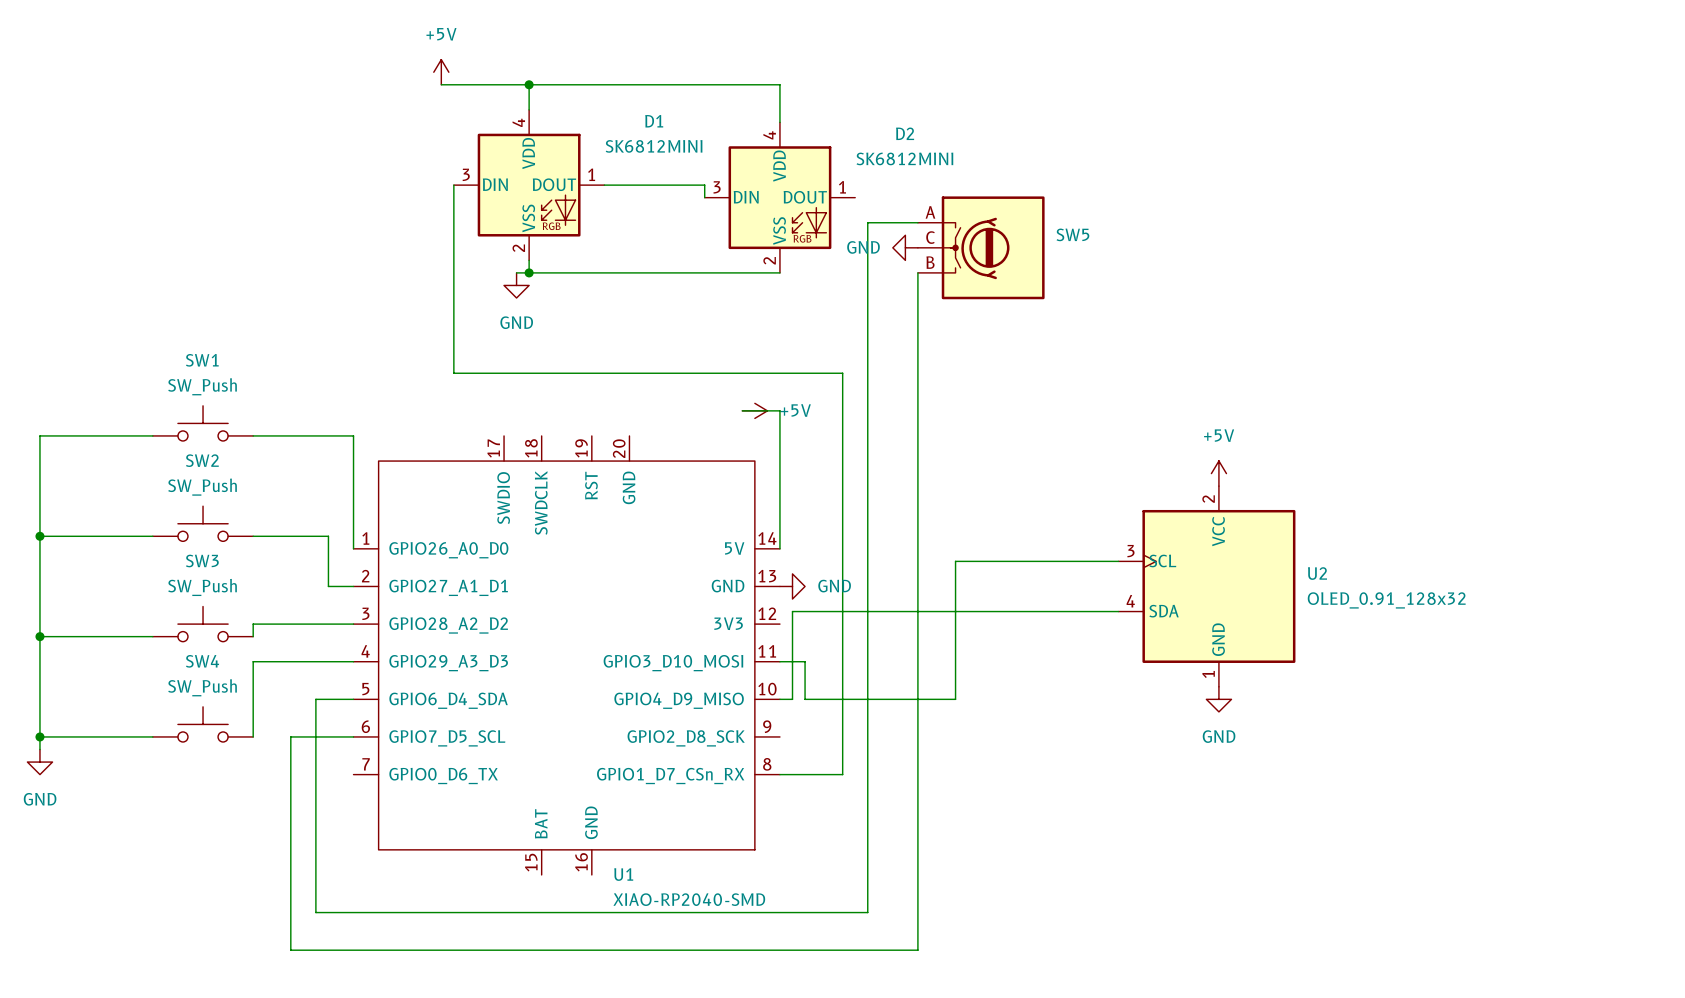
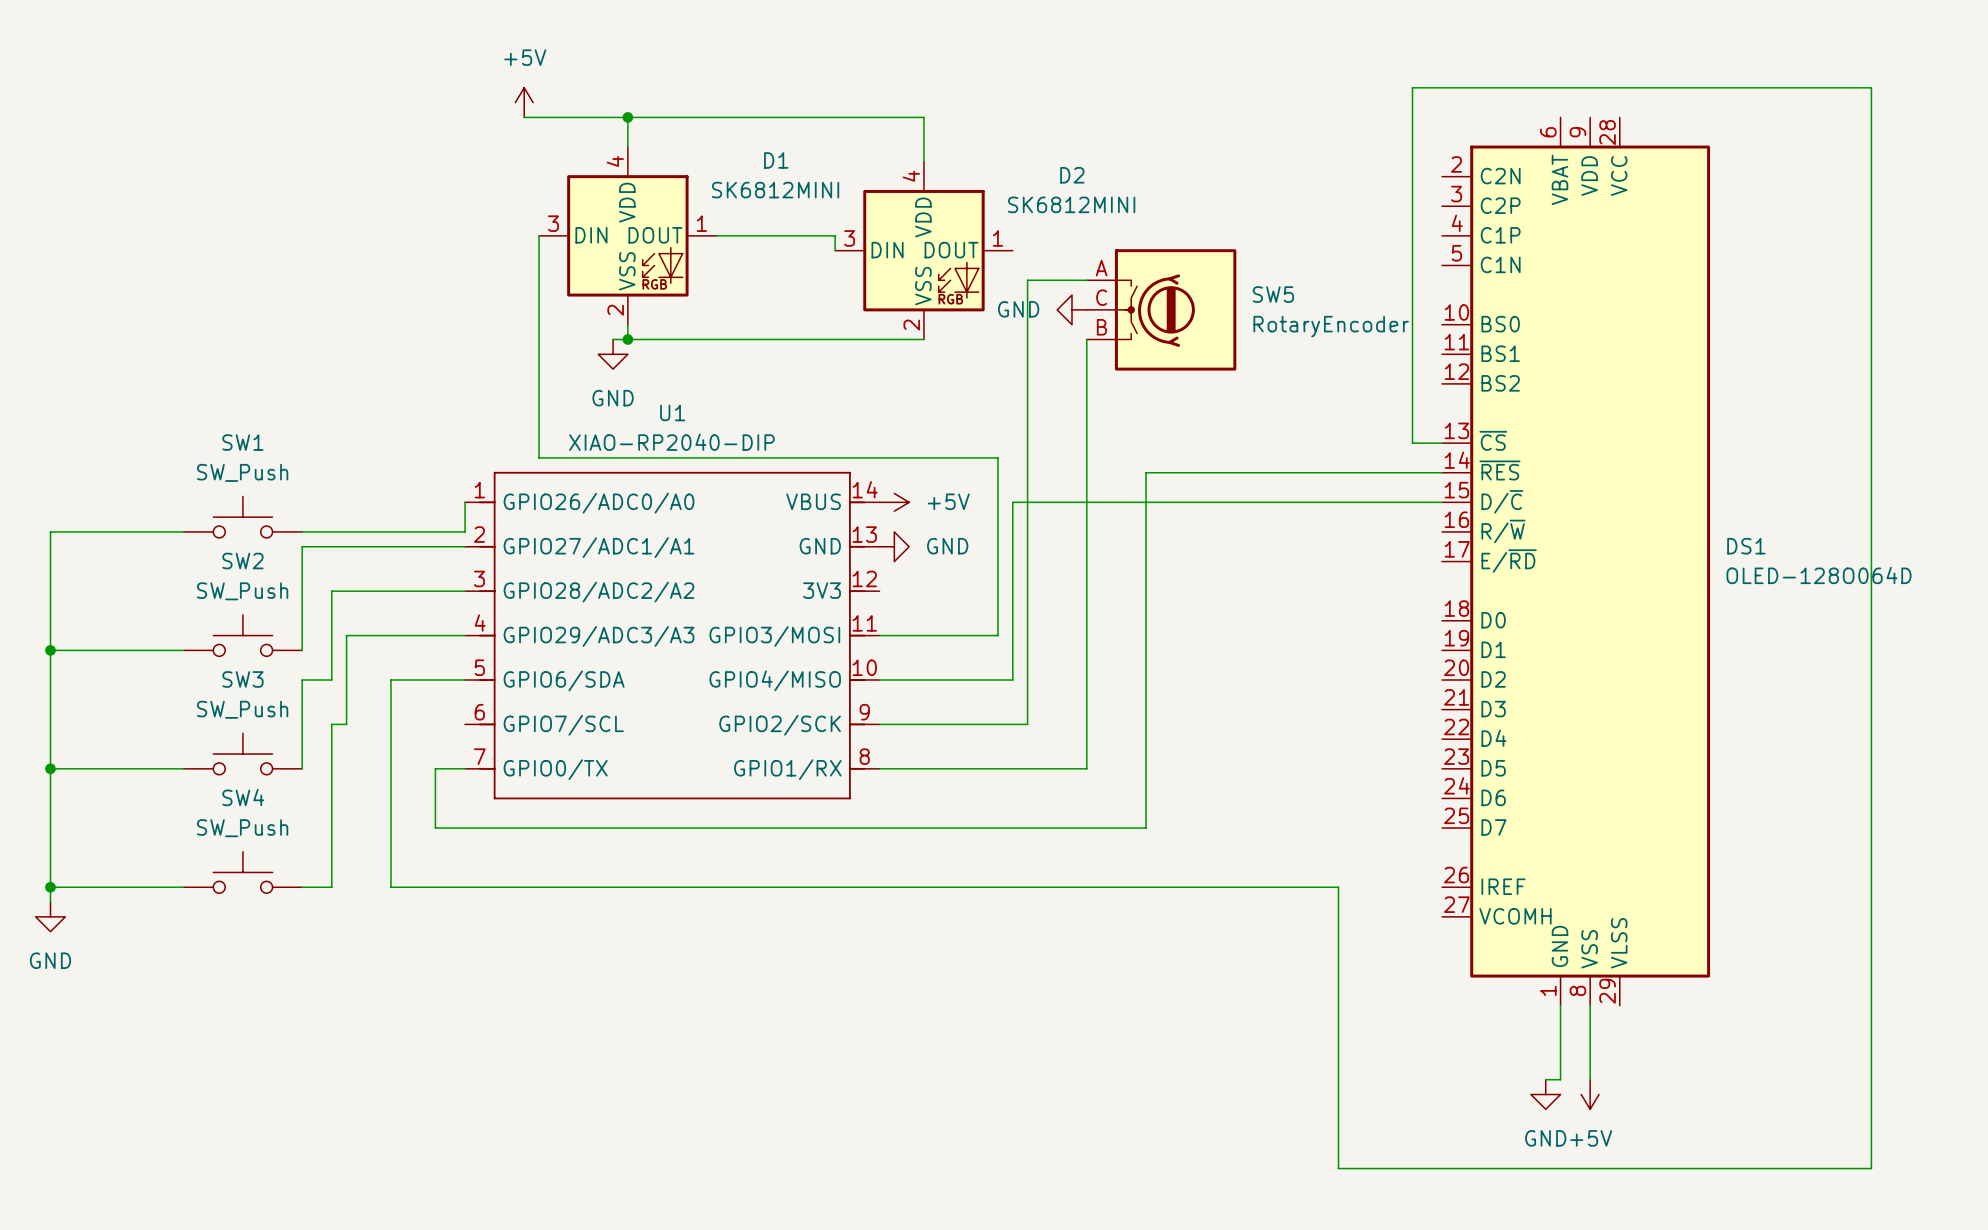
SW5 value: none -> RotaryEncoder (1331, 326)
wire: none -> (1442, 443) (1412, 443) (1412, 87) (1871, 87) (1871, 1168) (1338, 1168) (1338, 887) (420, 887)
wire: none -> (1442, 472) (1146, 472) (1146, 828) (435, 828) (435, 768) (465, 768)
wire: (742, 410) (779, 410) (779, 548) -> none
wire: none -> (1442, 502) (1012, 502) (1012, 680) (879, 680)
wire: (353, 435) (353, 548) -> (420, 531) (465, 531) (465, 502)
U1 symbol: [353, 435, 780, 875] -> [465, 471, 880, 800]
DS1: none -> OLED-128O064D (1576, 561)
power symbol: +5V (1218, 473) -> none
wire: (842, 523) (842, 774) (779, 774) -> (997, 635) (879, 635)
wire: (253, 536) (328, 536) (328, 561) -> (302, 650) (302, 546) (465, 546)
wire: none -> (390, 680) (465, 680)
wire: (1118, 561) (955, 561) (955, 699) (805, 699) (805, 661) (779, 661) -> none
wire: (328, 586) (353, 586) -> (390, 709) (390, 887)
power symbol position: GND (792, 586) -> GND (894, 546)
U2: OLED_0.91_128x32 (1207, 586) -> none
wire: (867, 599) (867, 912) (315, 912) (315, 699) (353, 699) -> (1027, 724) (879, 724)
wire: (1118, 611) (792, 611) (792, 699) (779, 699) -> none
wire: (253, 624) (353, 624) -> (302, 754) (302, 680) (331, 680) (331, 591) (465, 591)
wire: (917, 636) (917, 950) (290, 950) (290, 736) (328, 736) -> (1086, 768) (879, 768)
wire: (353, 661) (253, 661) (253, 736) -> (465, 635) (346, 635) (346, 724) (331, 724) (331, 887) (302, 887)
power symbol position: GND (1218, 699) -> GND (1545, 1094)
wire: none -> (1560, 1005) (1560, 1079) (1545, 1079)
wire: none -> (1590, 1005) (1590, 1079)
U1 name position: U1 (623, 874) -> U1 (672, 412)
U1 value: XIAO-RP2040-SMD (689, 899) -> XIAO-RP2040-DIP (671, 442)
power symbol: none -> +5V (1590, 1094)

